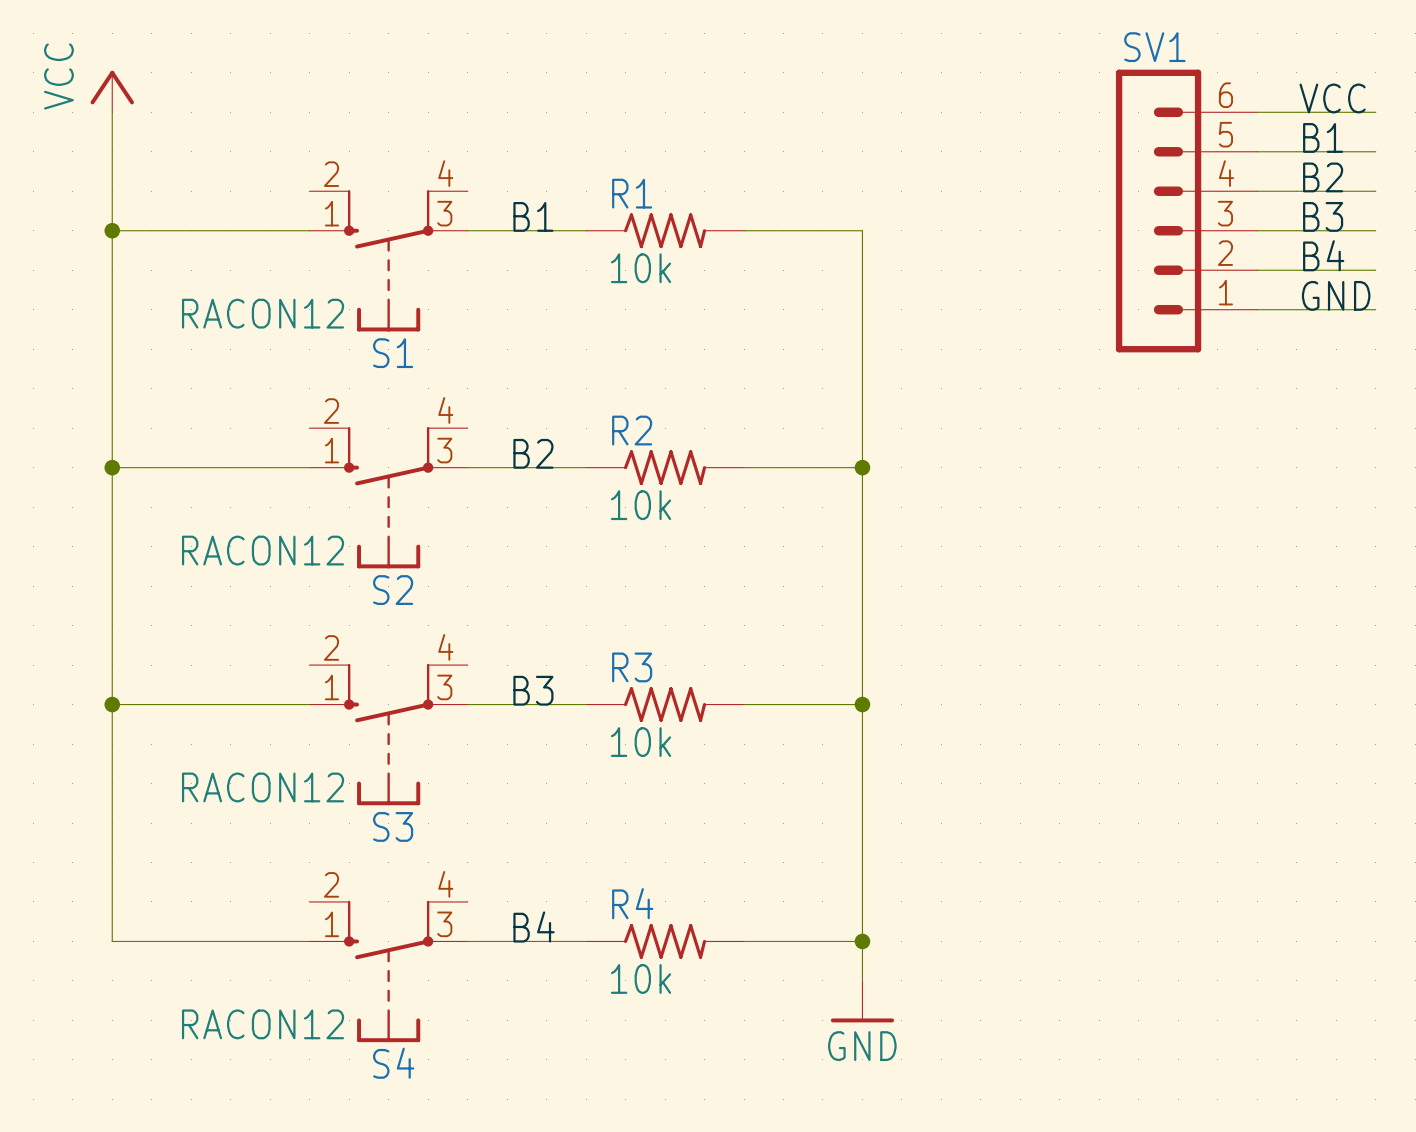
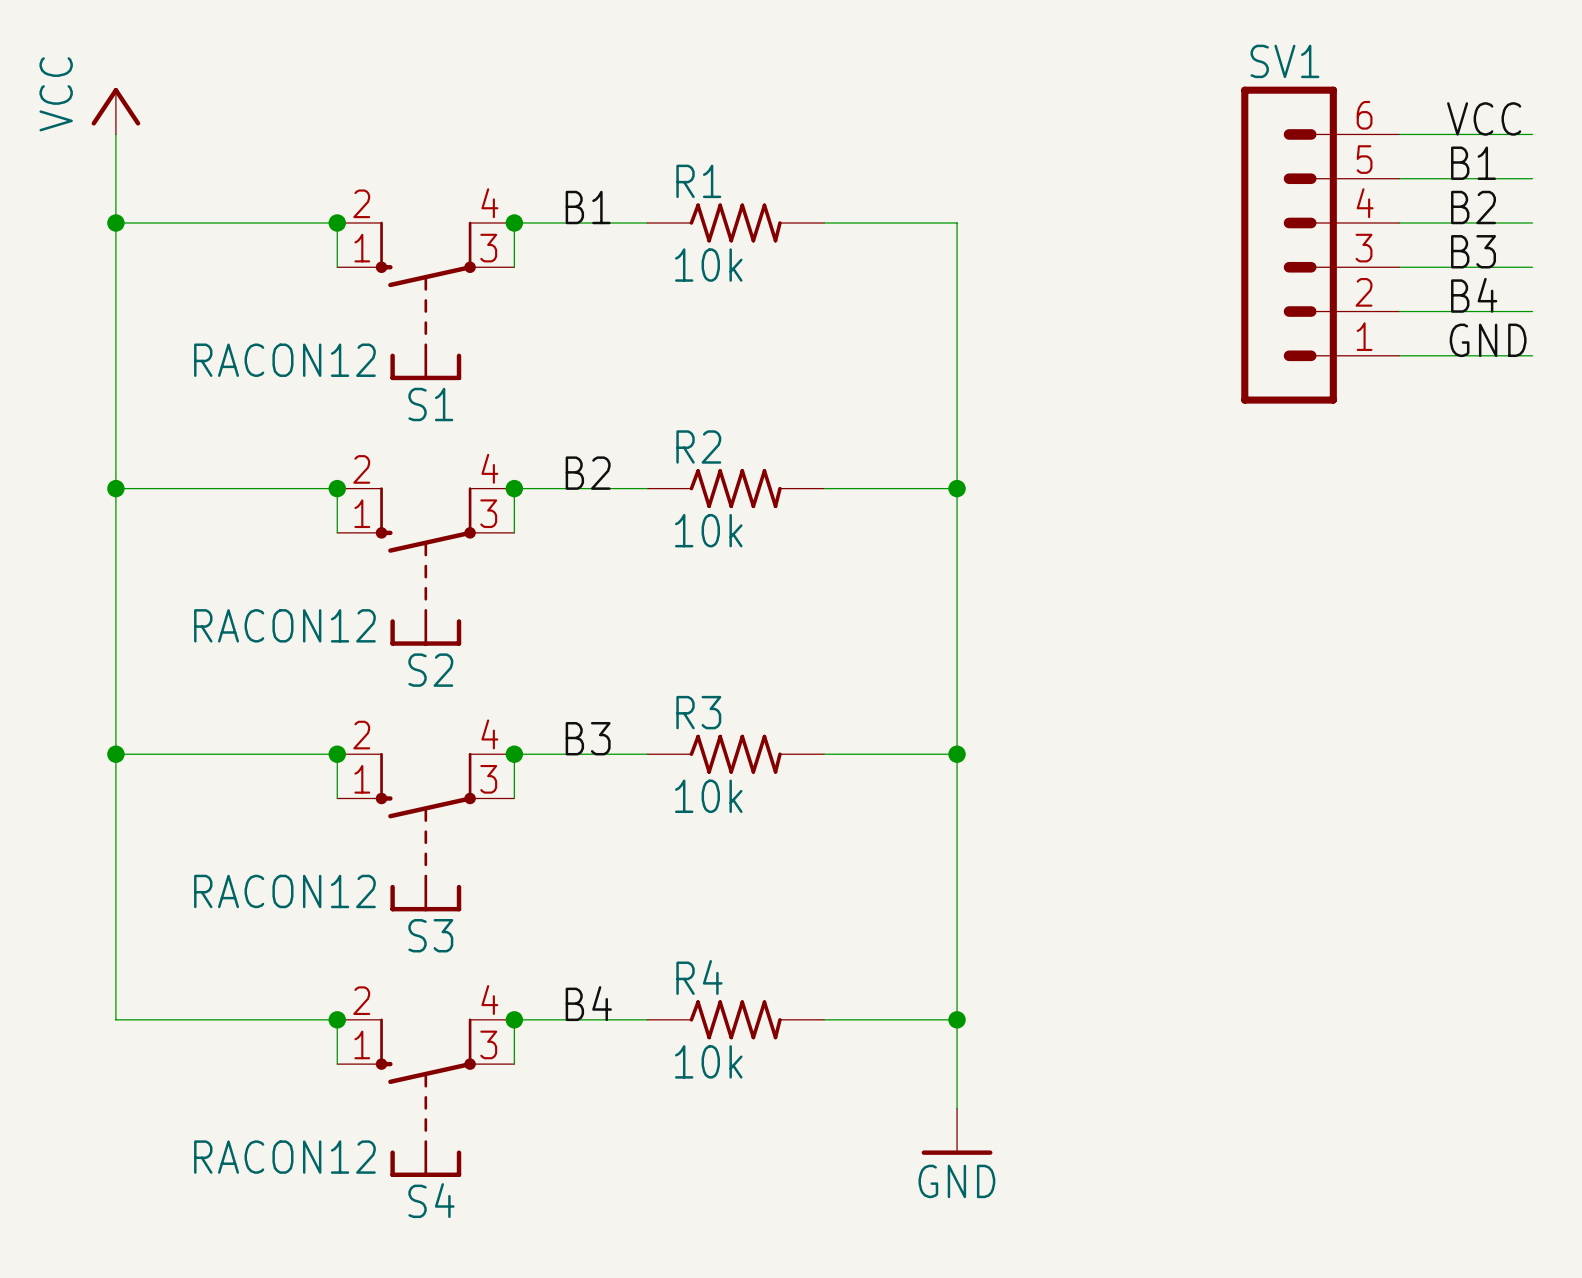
junction: none -> (337, 222)
junction: none -> (514, 222)
label position: B1 (533, 216) -> B1 (588, 207)
wire: (112, 230) (309, 230) -> (115, 222) (337, 222) (337, 267)
junction position: (112, 230) -> (115, 222)
wire: (467, 230) (586, 230) -> (514, 267) (514, 222) (647, 222)
R1 position: (665, 230) -> (735, 222)
wire: (744, 230) (862, 230) -> (824, 222) (957, 222) (957, 267)
junction: none -> (337, 488)
junction: none -> (514, 488)
label position: B2 (533, 453) -> B2 (588, 473)
wire: (112, 467) (309, 467) -> (115, 488) (337, 488) (337, 532)
junction position: (112, 467) -> (115, 488)
wire: (467, 467) (586, 467) -> (514, 532) (514, 488) (647, 488)
R2 position: (665, 467) -> (735, 488)
wire: (744, 467) (862, 467) -> (824, 488) (957, 488)
junction position: (862, 467) -> (957, 488)
junction: none -> (337, 754)
junction: none -> (514, 754)
label position: B3 (533, 690) -> B3 (588, 738)
wire: (112, 704) (309, 704) -> (115, 754) (337, 754) (337, 798)
junction position: (112, 704) -> (115, 754)
wire: (467, 704) (586, 704) -> (514, 798) (514, 754) (647, 754)
R3 position: (665, 704) -> (735, 754)
wire: (744, 704) (862, 704) -> (824, 754) (957, 754)
junction position: (862, 704) -> (957, 754)
wire: (112, 901) (112, 941) (309, 941) -> (115, 1019) (337, 1019) (337, 1064)
junction: none -> (337, 1019)
junction: none -> (514, 1019)
label position: B4 (534, 926) -> B4 (588, 1003)
wire: (467, 941) (586, 941) -> (514, 1064) (514, 1019) (647, 1019)
R4 position: (665, 941) -> (735, 1019)
wire: (744, 941) (862, 941) -> (824, 1019) (957, 1019)
junction position: (862, 941) -> (957, 1019)

